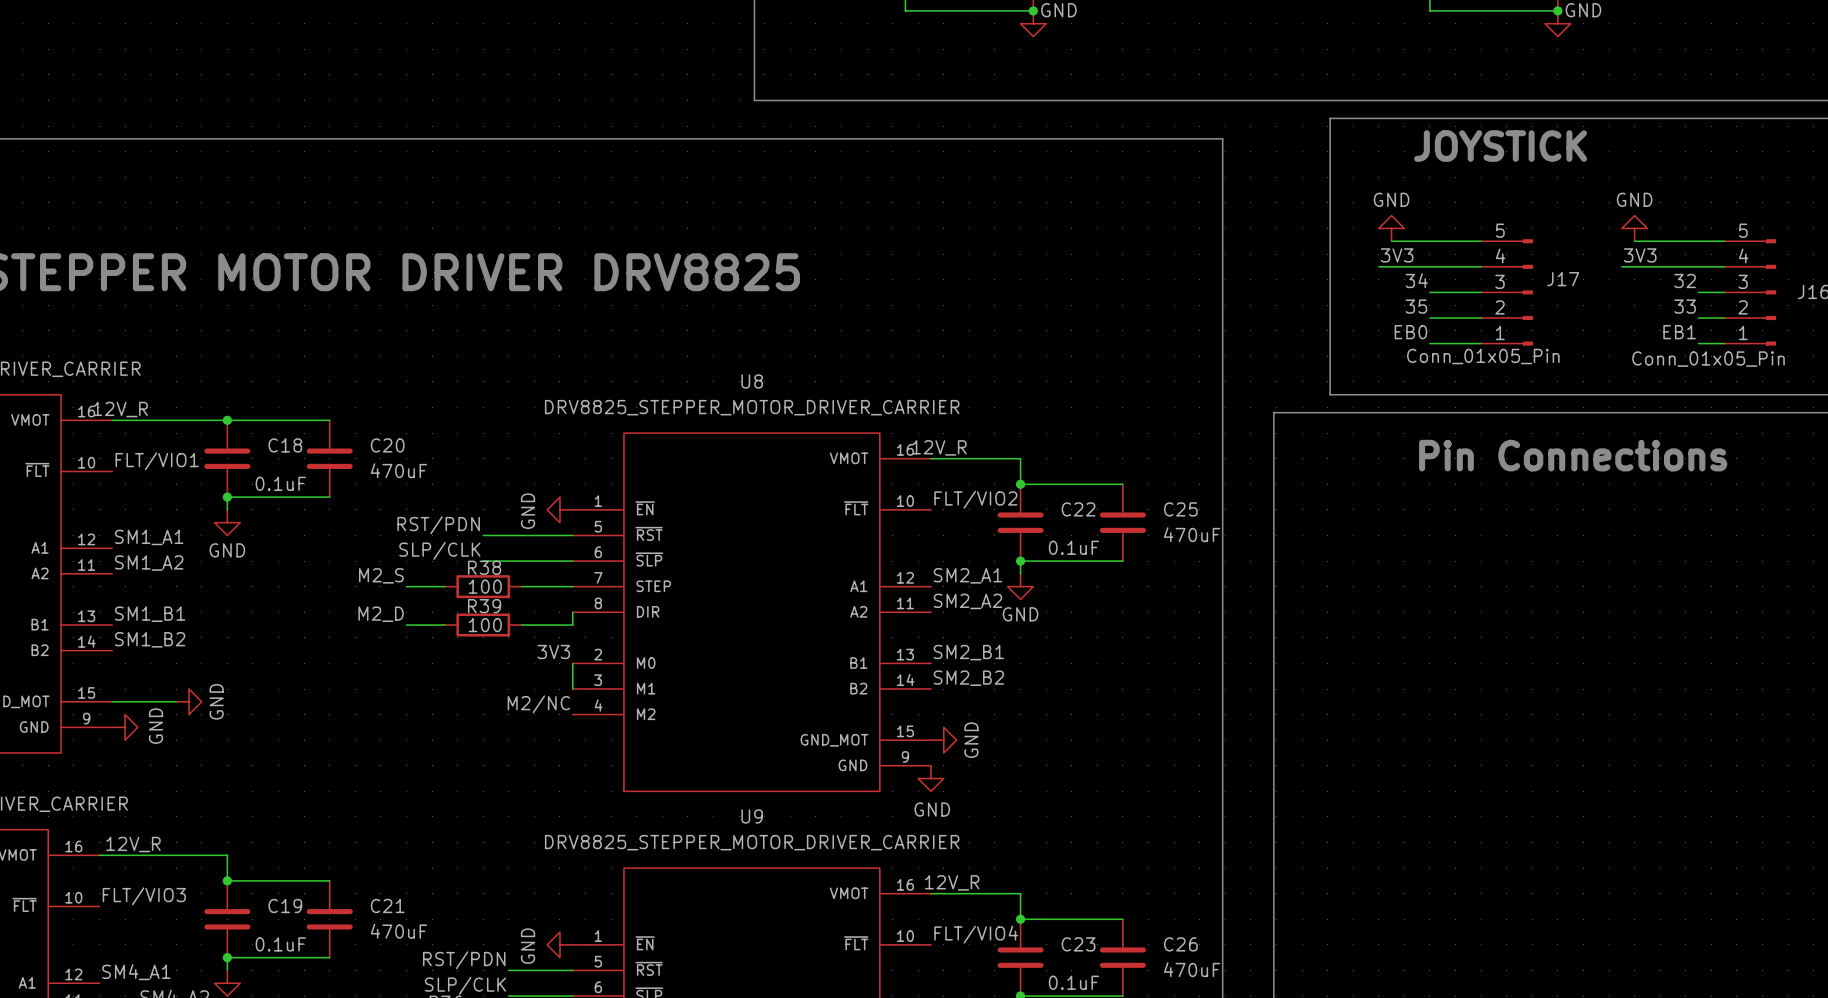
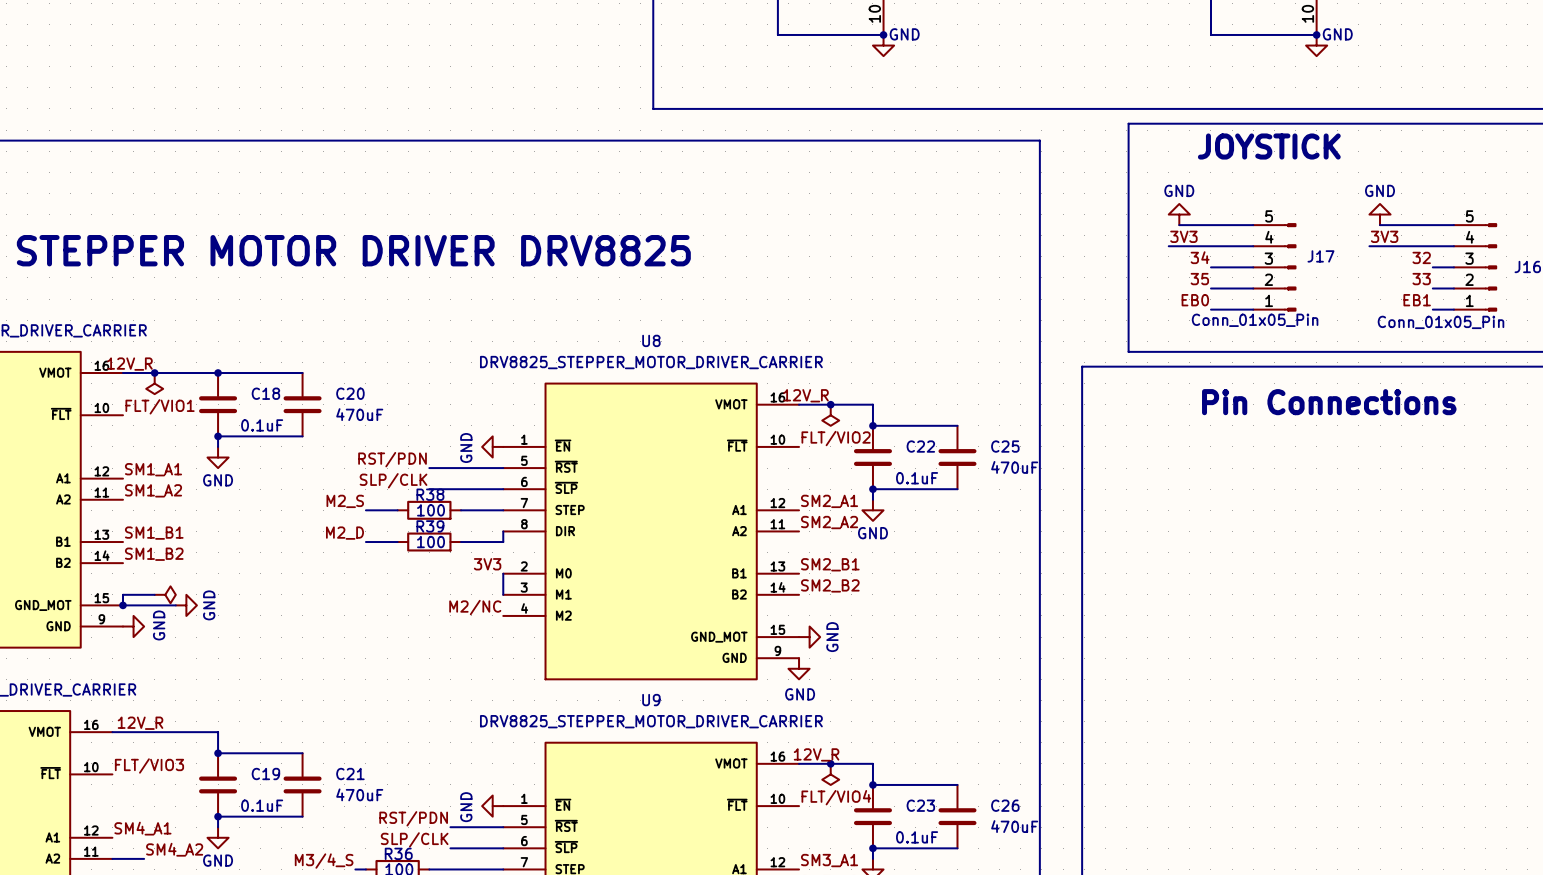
junction: none -> (154, 373)
power symbol: none -> (154, 383)
junction: none -> (830, 404)
power symbol: none -> (830, 415)
wire: none -> (154, 594) (122, 594) (122, 605)
power symbol: none -> (165, 594)
junction: none -> (122, 605)
junction: none -> (830, 763)
power symbol: none -> (830, 774)

